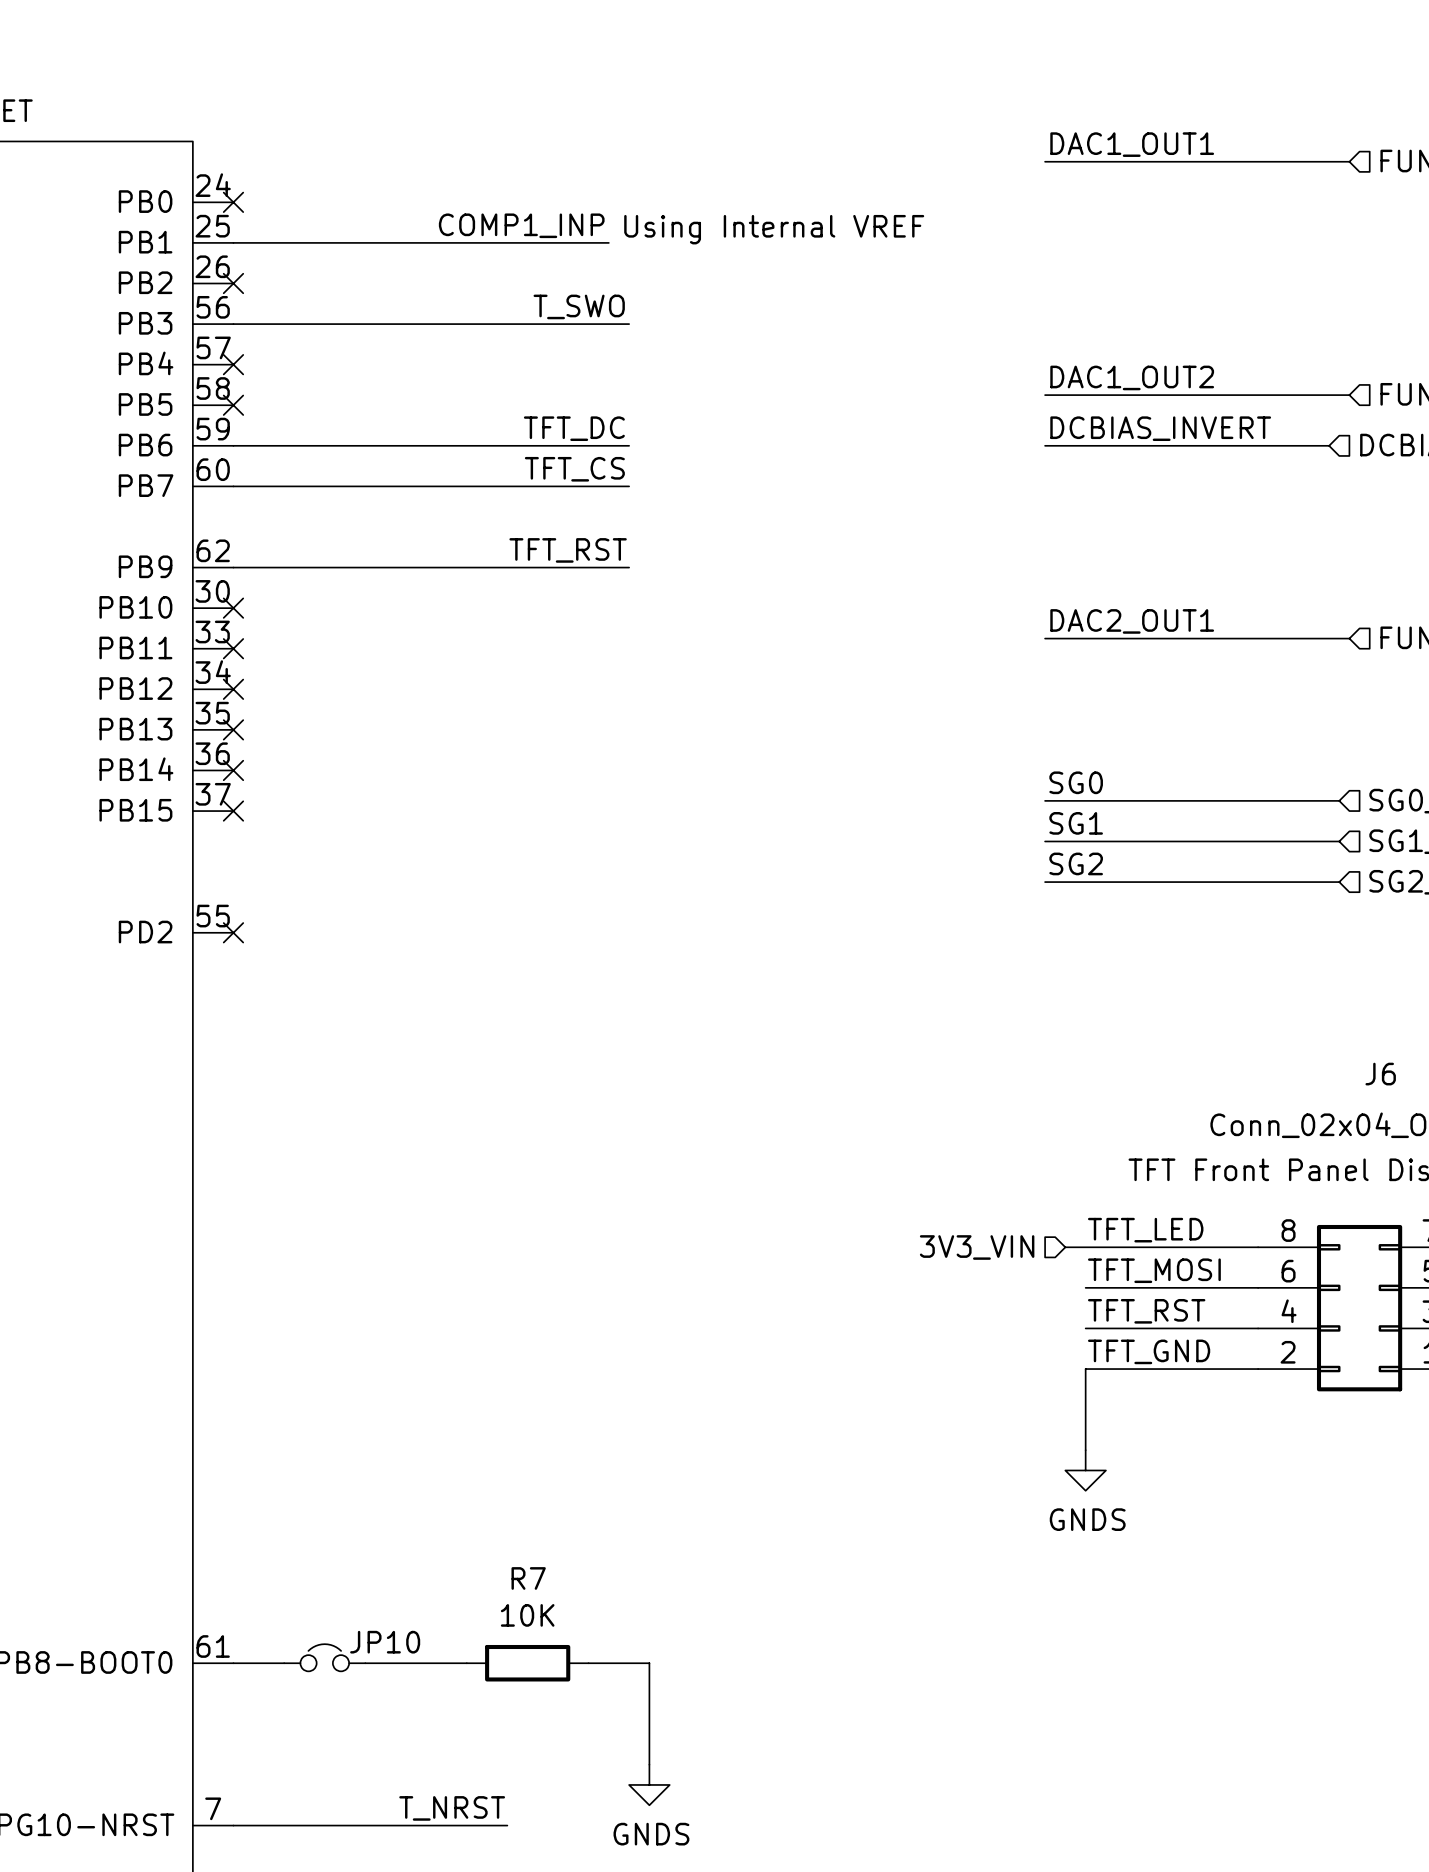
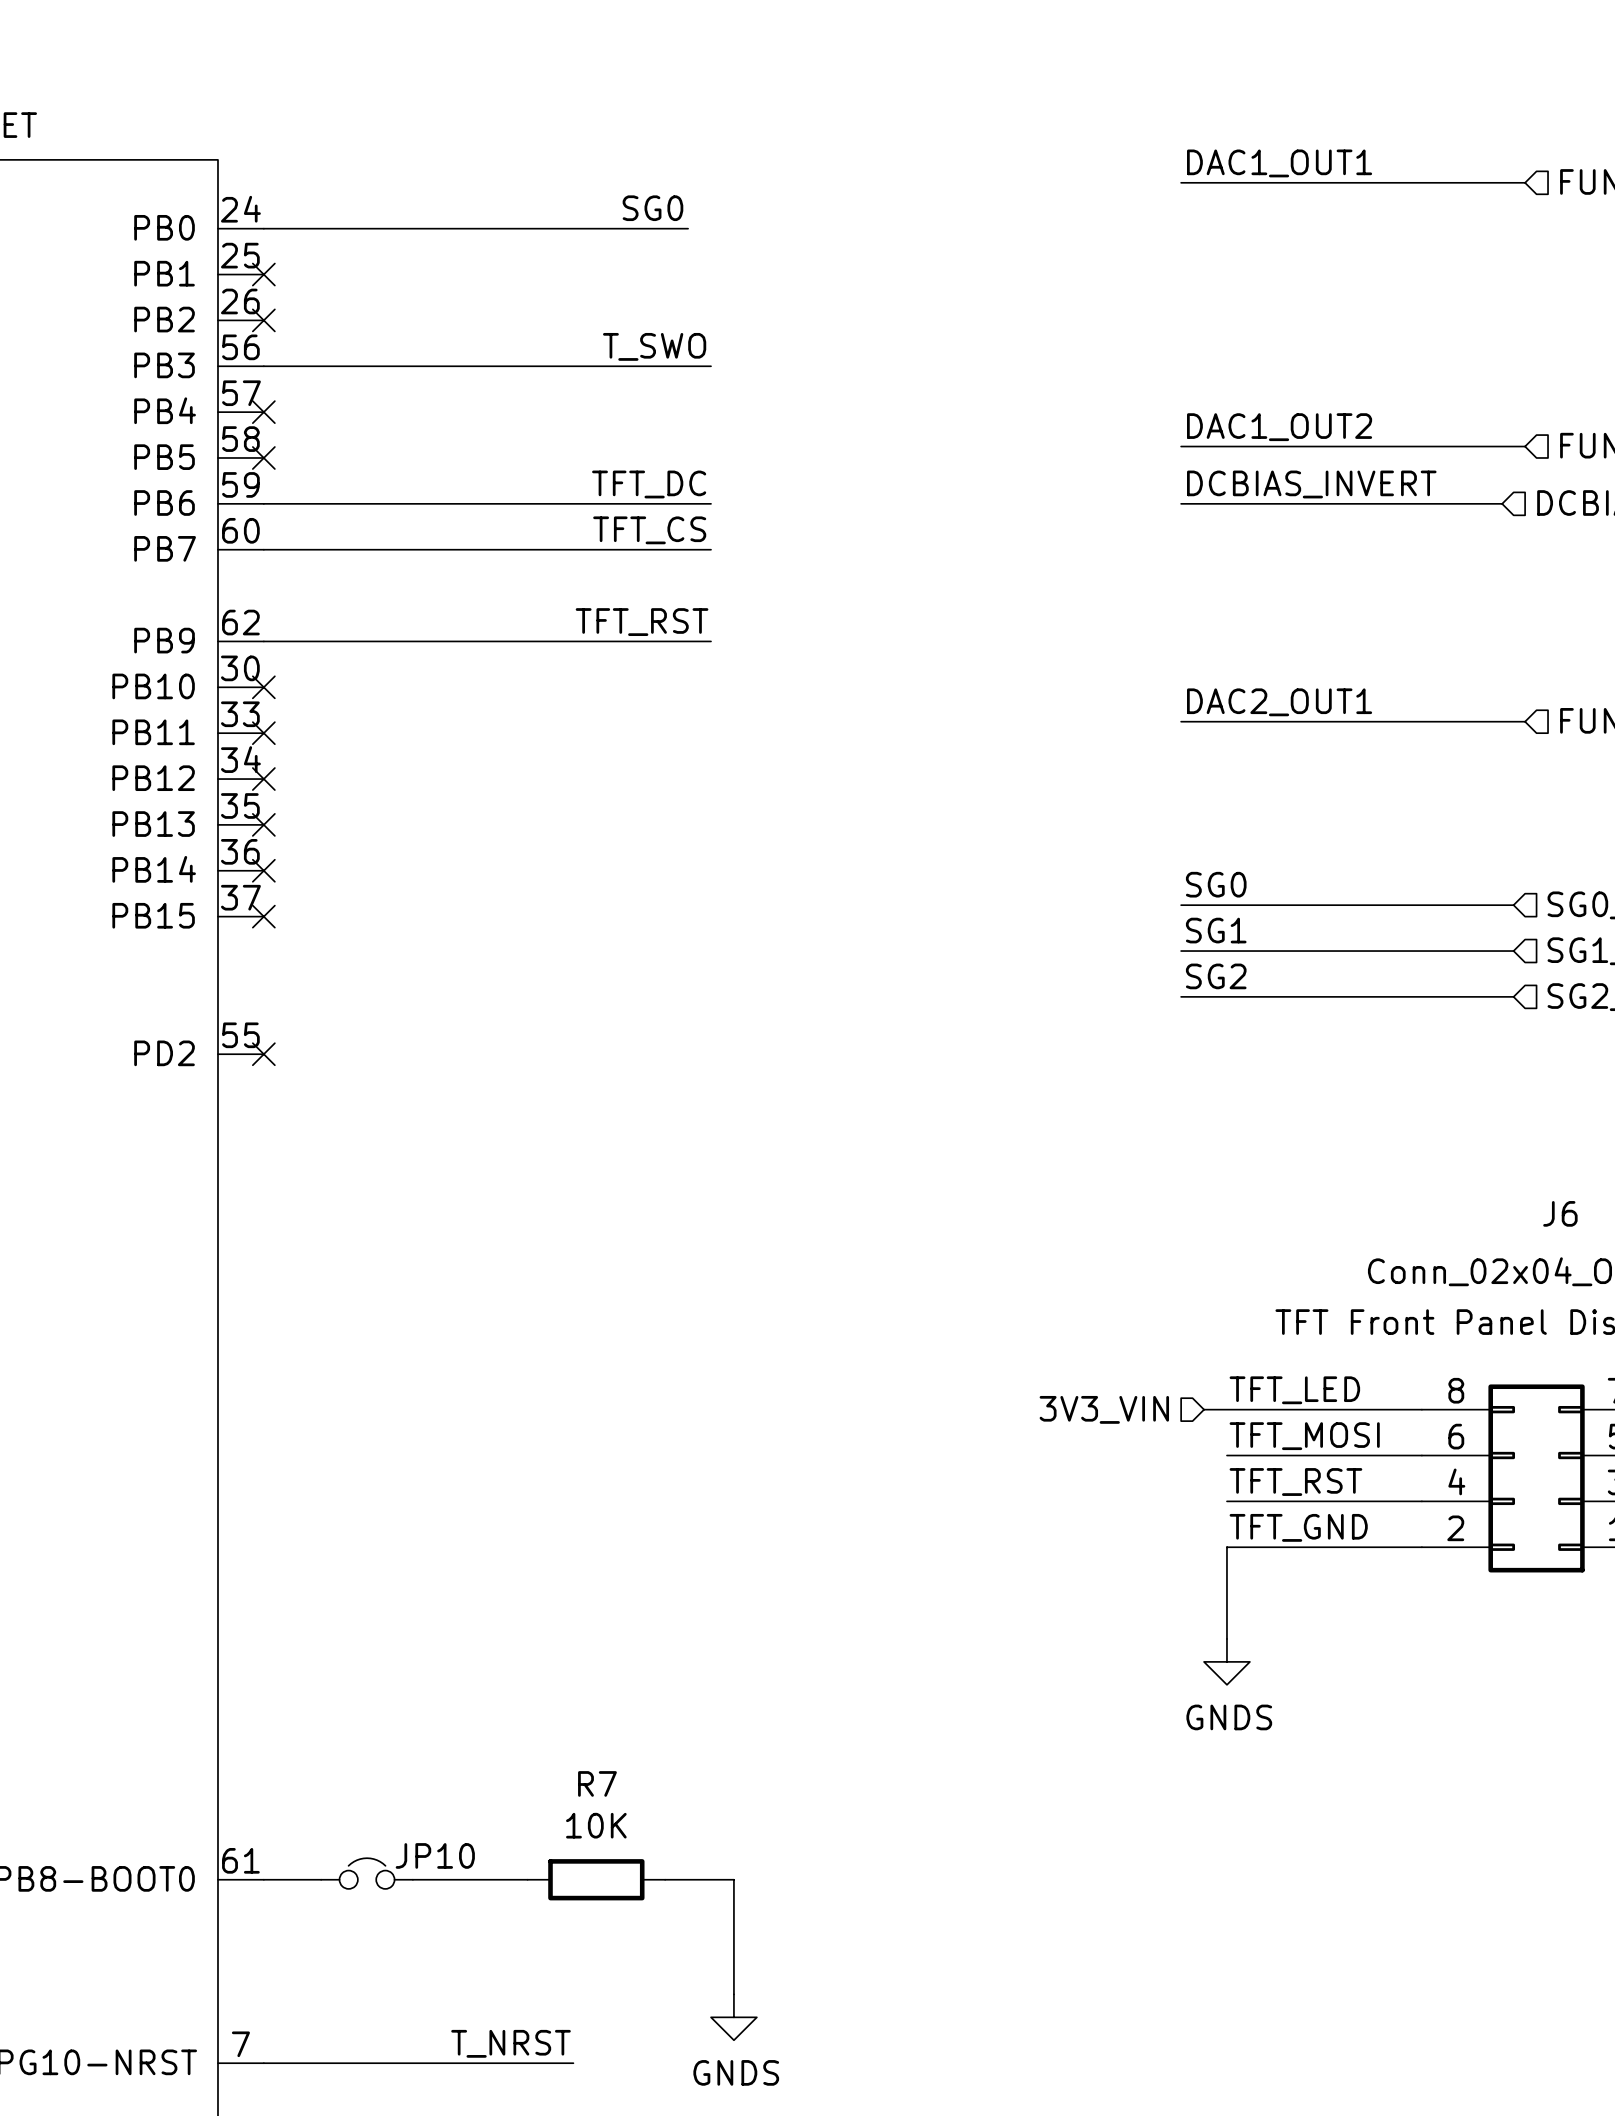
label: none -> SG0 (652, 208)
no-connect mark position: (233, 202) -> (263, 274)
label: COMP1_INP (521, 225) -> none
text: Using Internal VREF (774, 229) -> none
wire: (233, 242) (608, 242) -> (263, 228) (688, 228)

